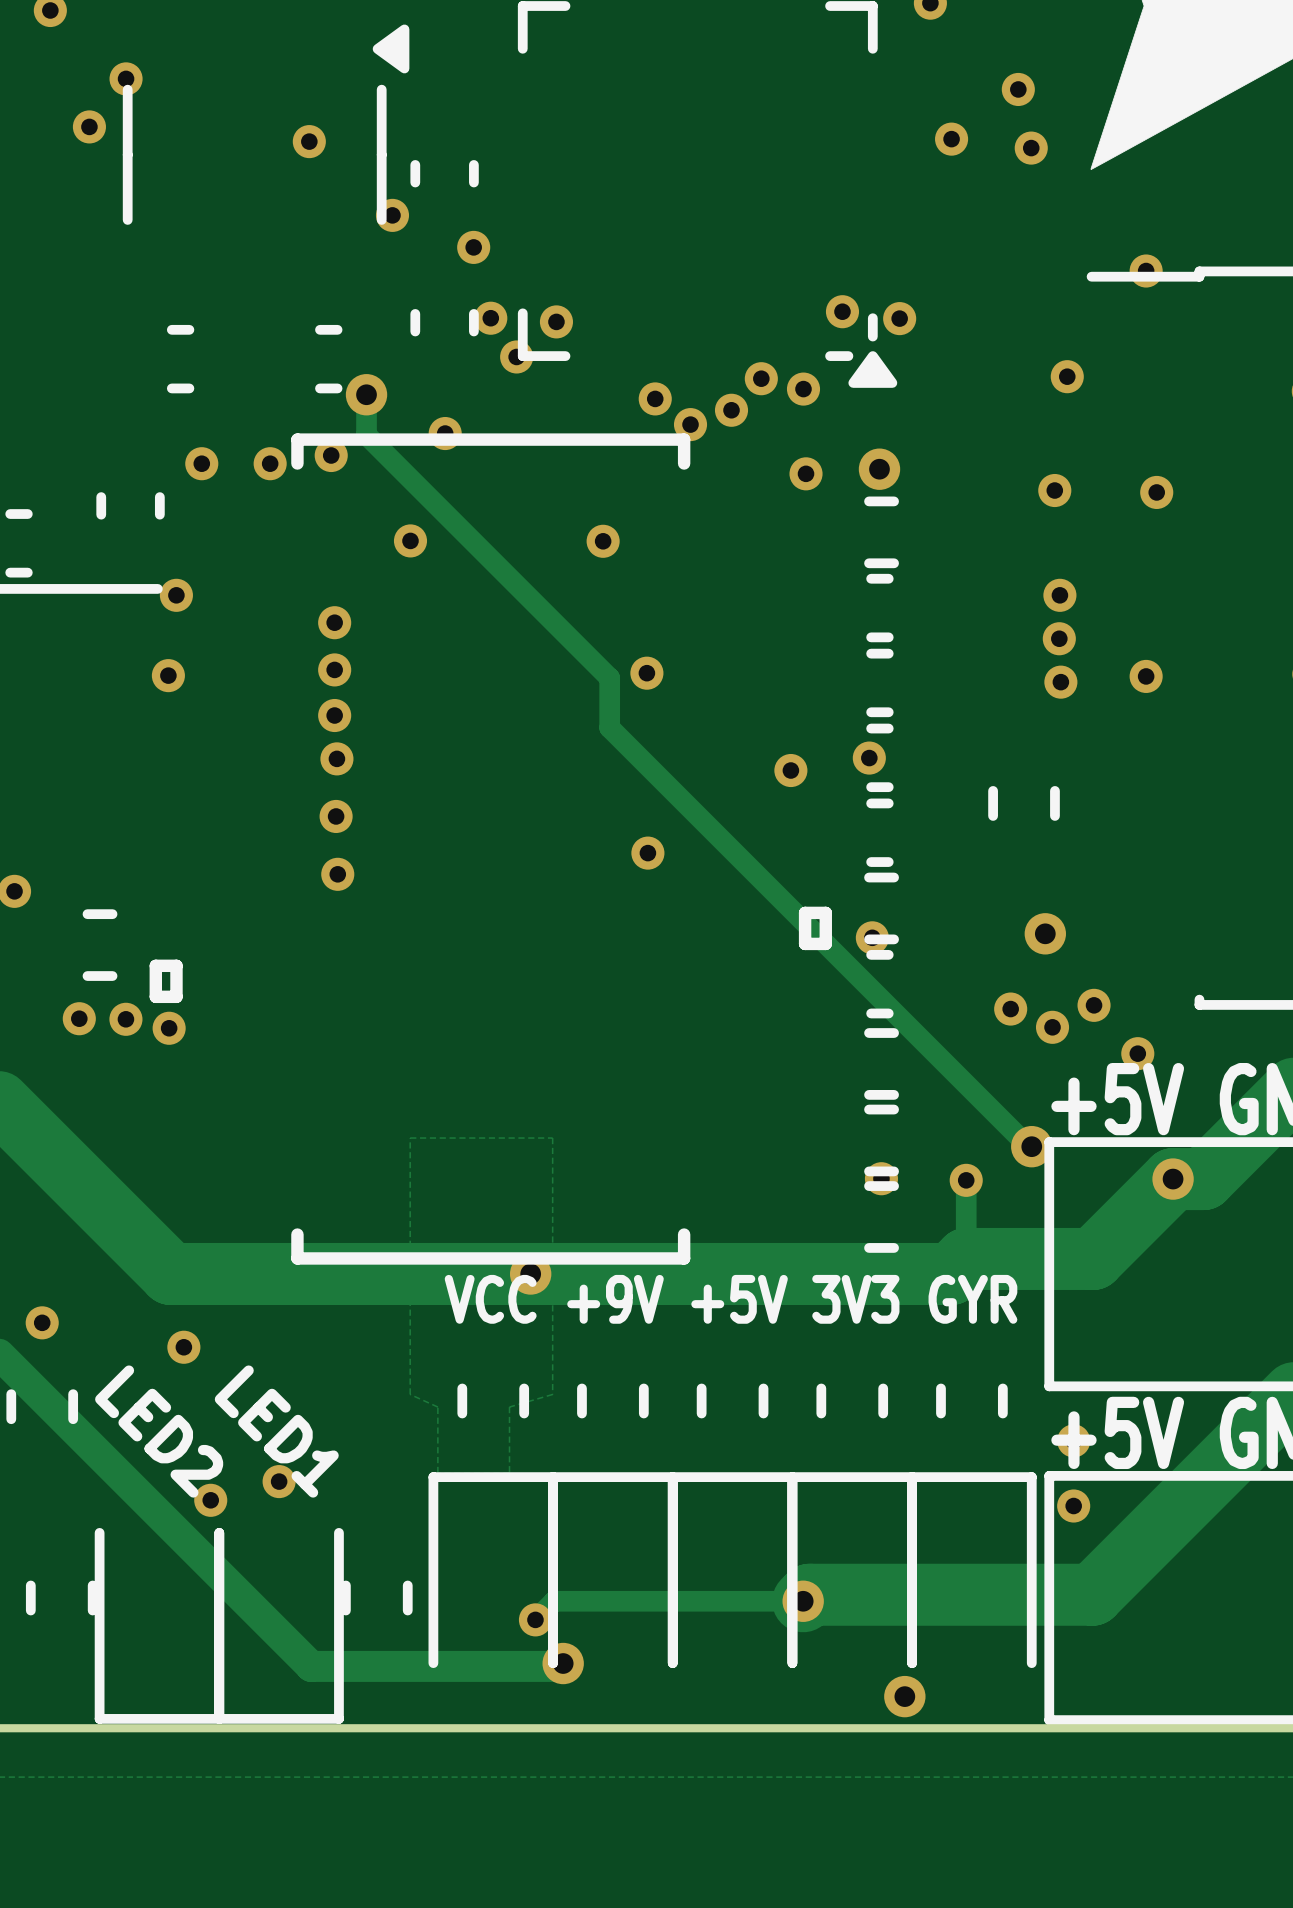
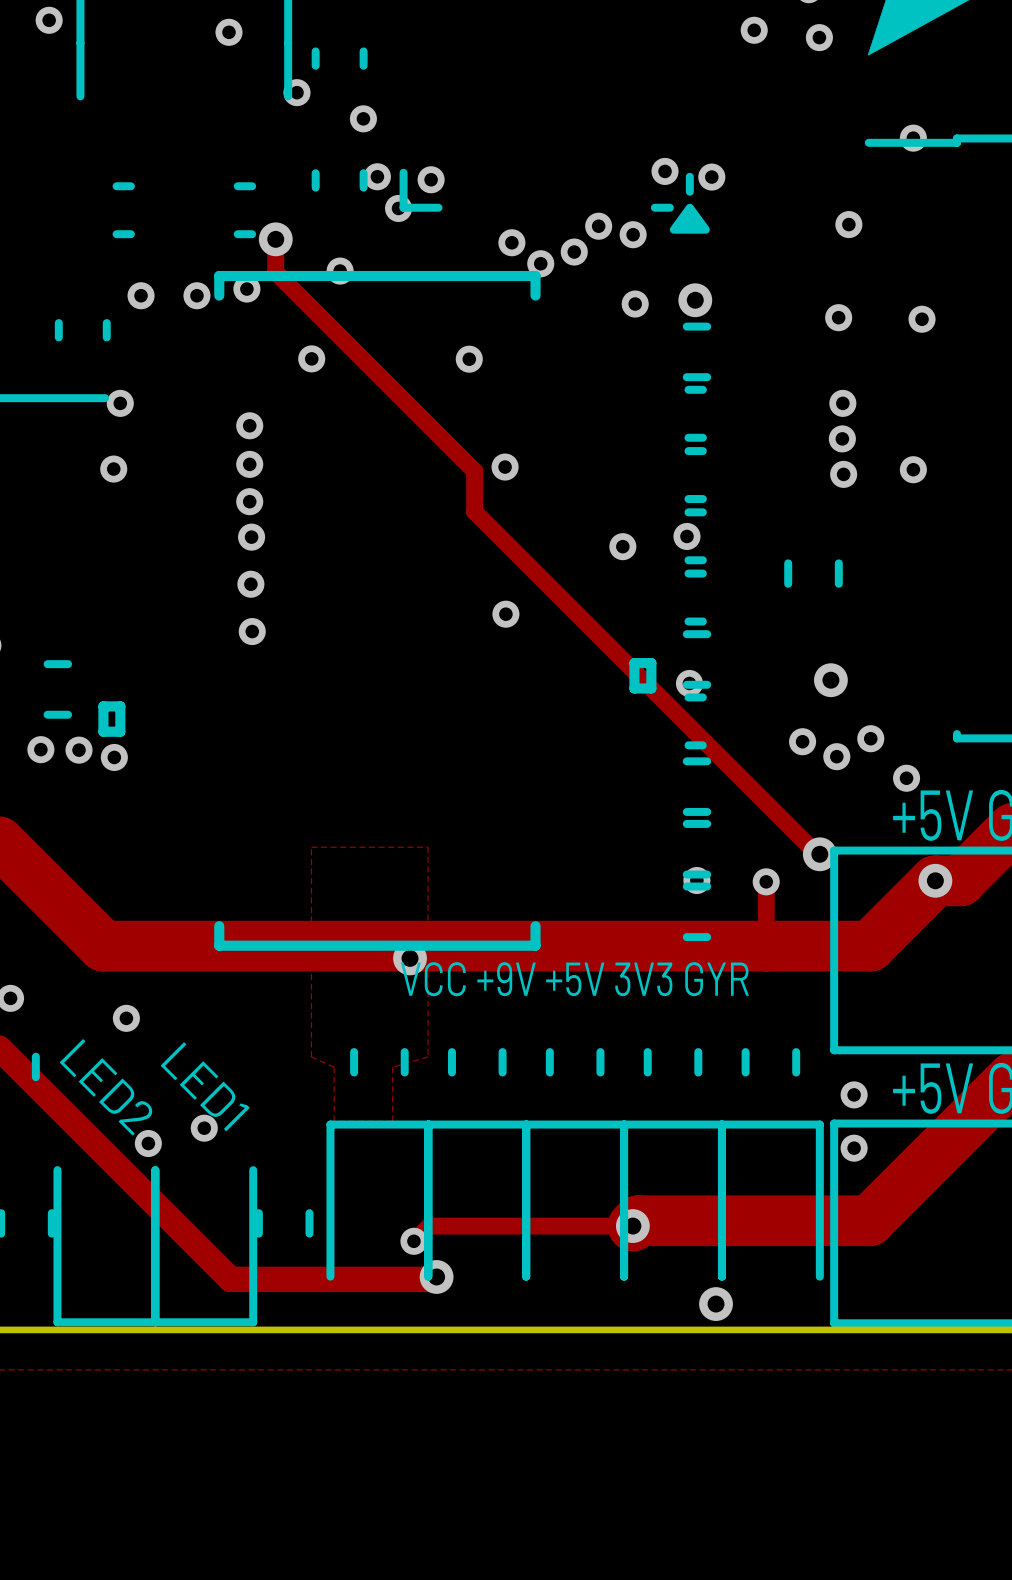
track: (155, 1258) (170, 1273) (951, 1273) (966, 1258) -> (103, 946) (766, 946)

